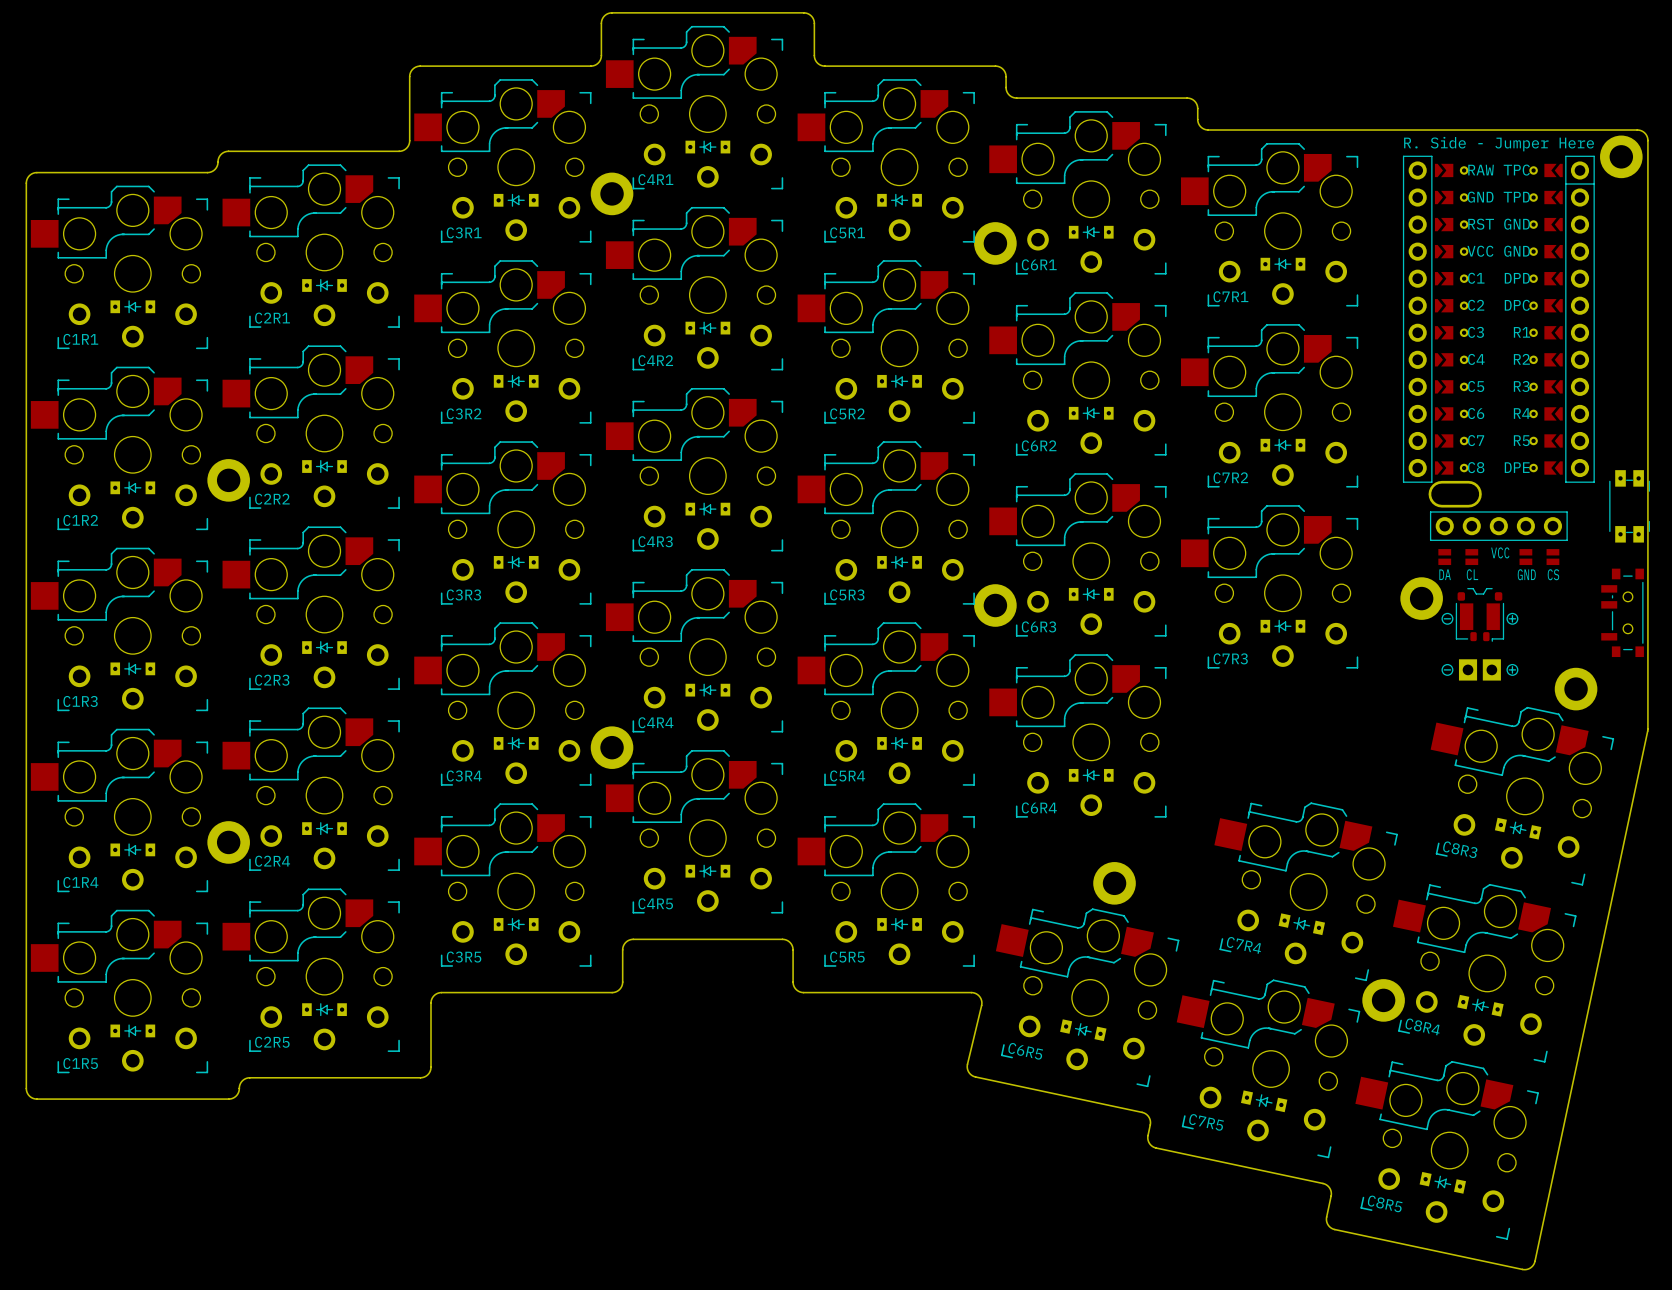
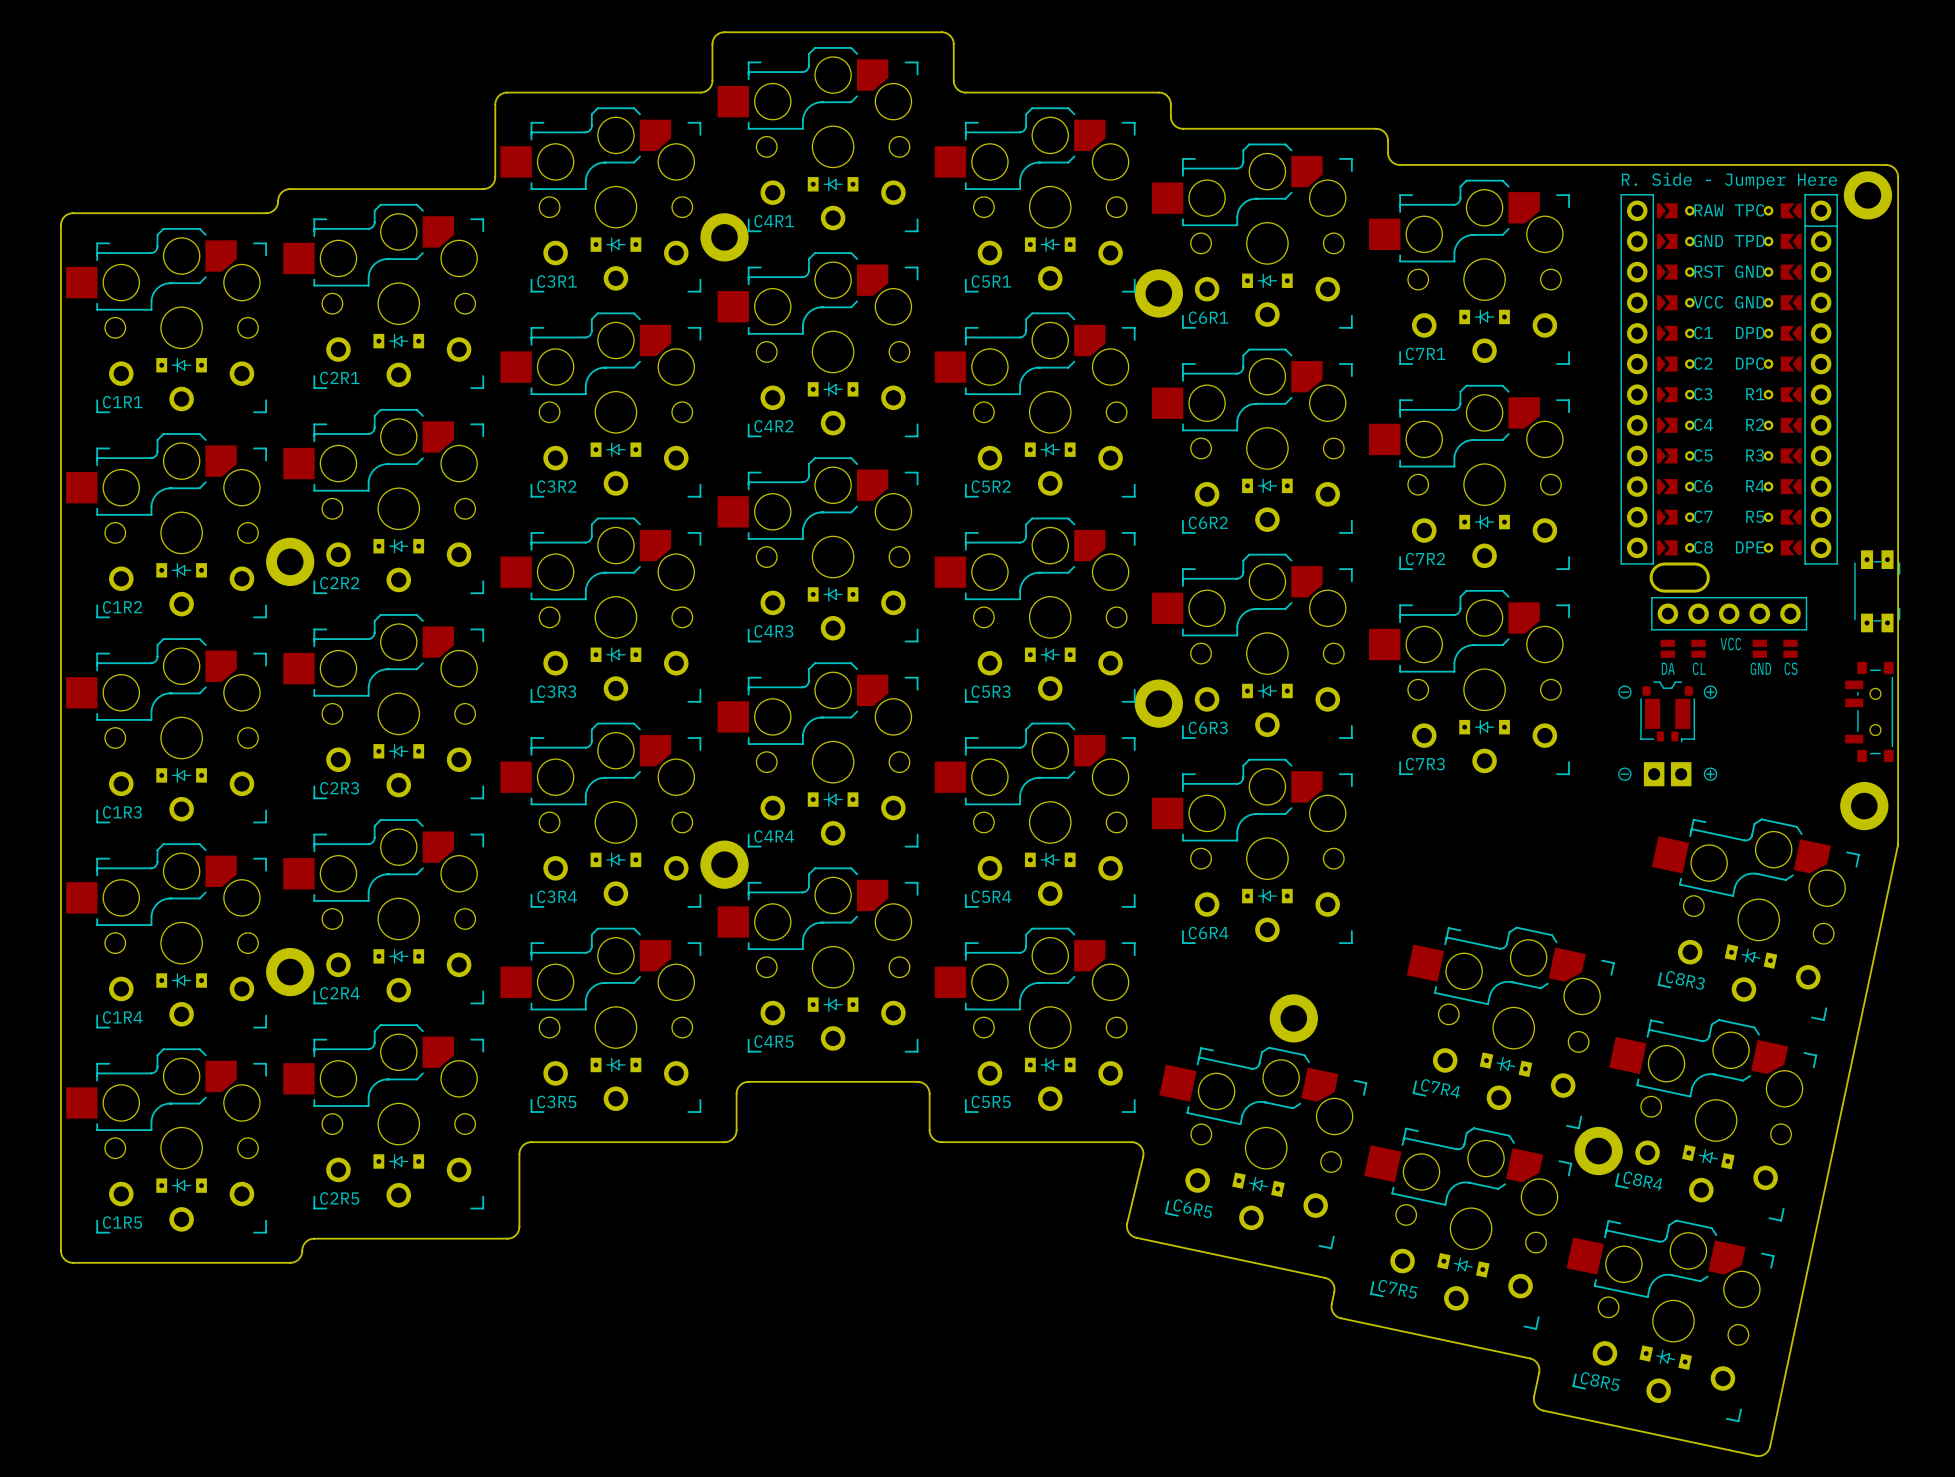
drawing: none -> [1618, 685, 1718, 699]
part: (1421, 598) -> none
drawing: [1441, 612, 1519, 625] -> none
part position: (1479, 614) -> (1667, 711)
part position: (1479, 616) -> (1667, 713)
drawing: none -> [1618, 767, 1718, 781]
drawing: [1441, 664, 1519, 676] -> none
part position: (1479, 669) -> (1667, 774)
part position: (1576, 689) -> (1864, 806)

